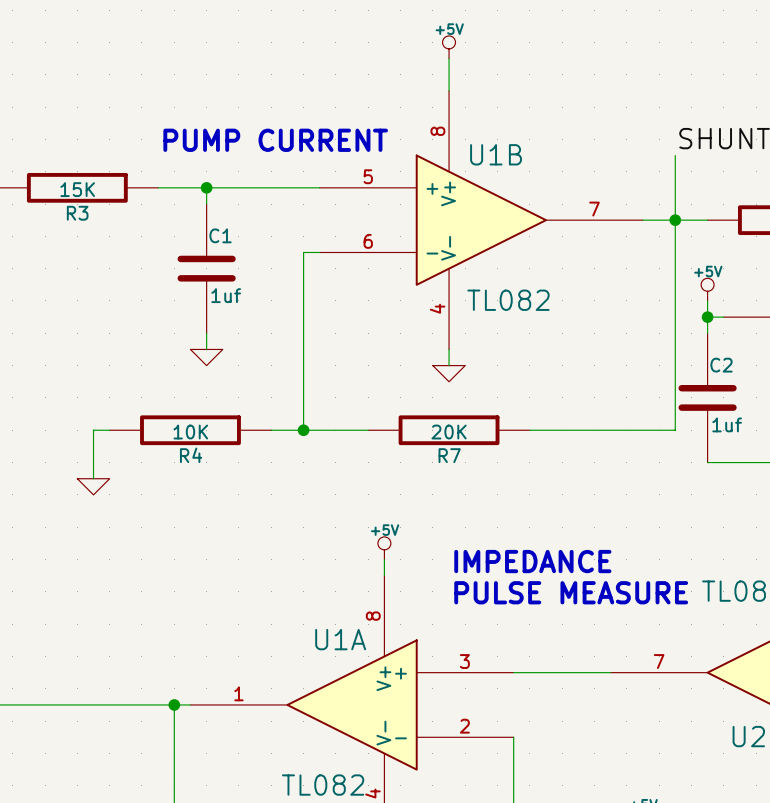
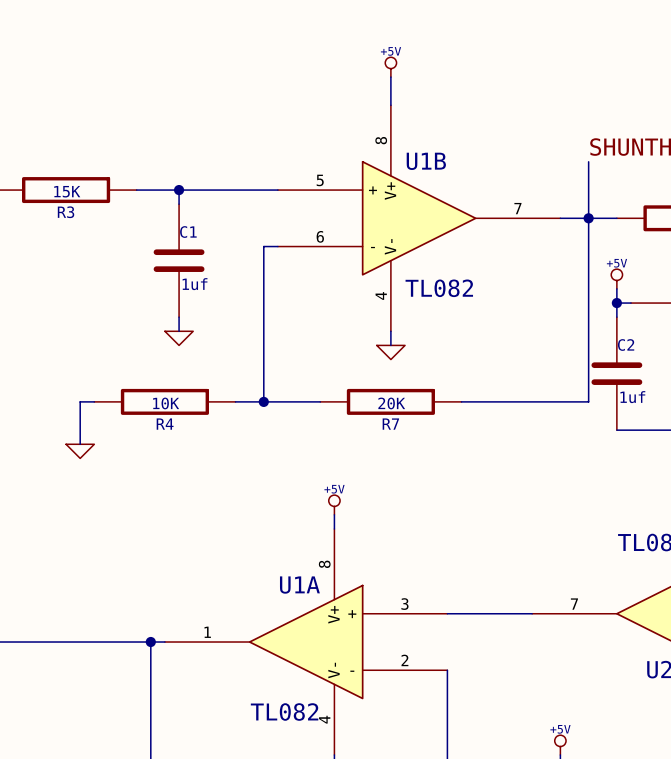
text: PUMP CURRENT (275, 140) -> none
text: IMPEDANCE (532, 561) -> none
text: PULSE MEASURE (571, 592) -> none

